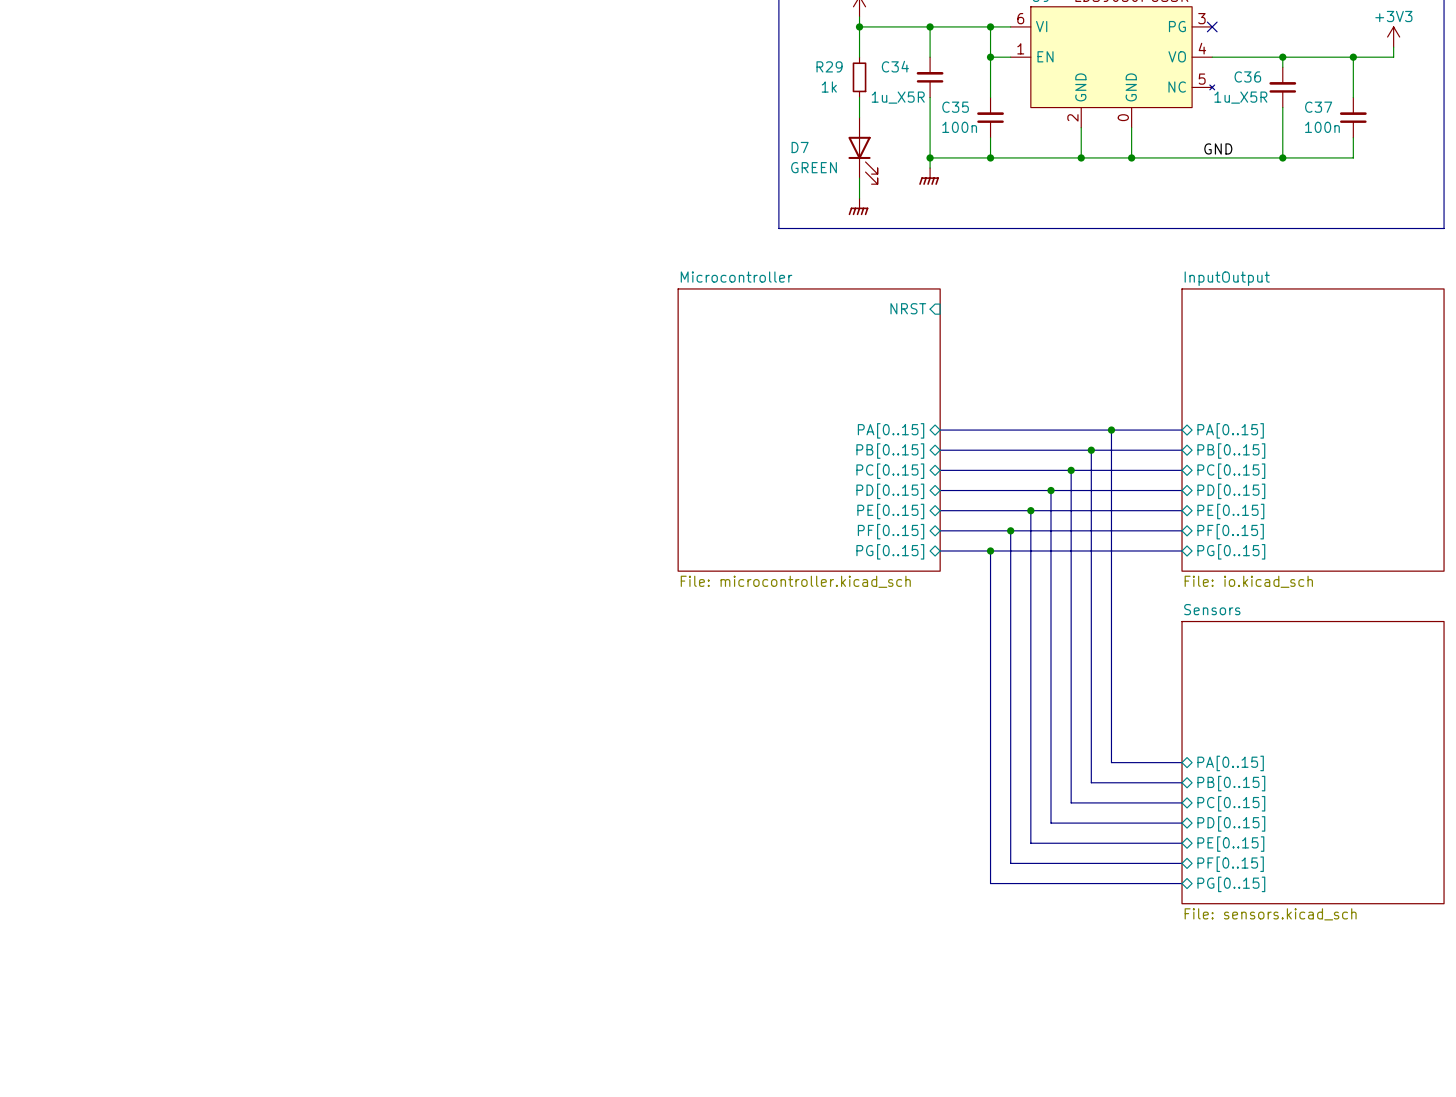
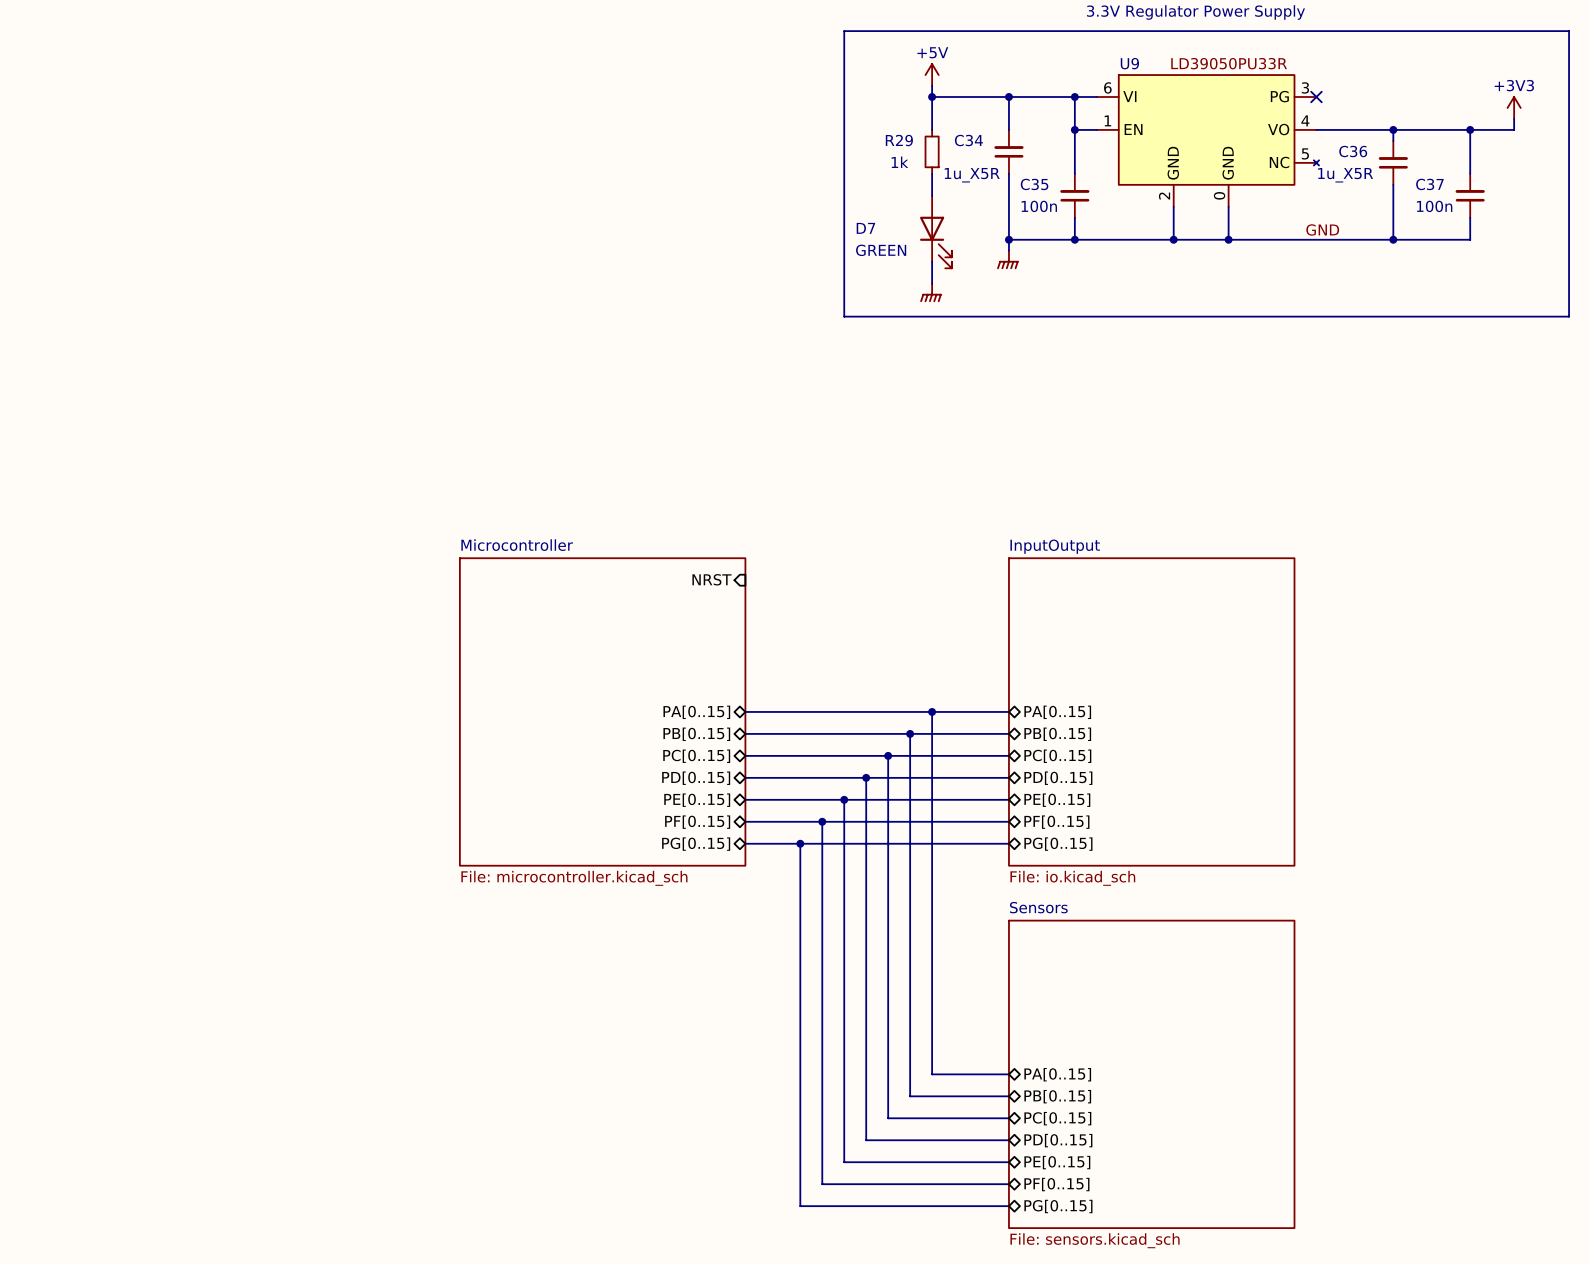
sheet pin: NRST (908, 308) -> none
sheet Microcontroller: File: microcontroller.kicad_sch (809, 430) -> none
sheet pin: PA[0..15] (891, 430) -> none
bus: (940, 430) (1182, 430) -> none
bus: (1111, 430) (1111, 762) (1182, 762) -> none
junction: (1111, 430) -> none
sheet pin: PA[0..15] (1230, 430) -> none
sheet InputOutput: File: io.kicad_sch (1313, 430) -> none
bus: (940, 450) (1182, 450) -> none
bus: (1091, 450) (1091, 782) (1182, 782) -> none
junction: (1091, 450) -> none
sheet pin: PB[0..15] (890, 451) -> none
sheet pin: PB[0..15] (1231, 451) -> none
sheet pin: none -> NRST (711, 579)
bus: (940, 470) (1182, 470) -> none
bus: (1071, 470) (1071, 802) (1182, 802) -> none
junction: (1071, 470) -> none
sheet pin: PC[0..15] (890, 471) -> none
sheet pin: PC[0..15] (1231, 471) -> none
bus: (940, 490) (1182, 490) -> none
bus: (1051, 490) (1051, 823) (1182, 823) -> none
junction: (1051, 490) -> none
sheet pin: PD[0..15] (890, 491) -> none
sheet pin: PD[0..15] (1231, 491) -> none
bus: (940, 510) (1182, 510) -> none
bus: (1030, 510) (1030, 843) (1182, 843) -> none
junction: (1030, 510) -> none
sheet pin: PE[0..15] (890, 511) -> none
sheet pin: PE[0..15] (1230, 511) -> none
bus: (940, 530) (1182, 530) -> none
bus: (1010, 530) (1010, 863) (1182, 863) -> none
junction: (1010, 530) -> none
sheet pin: PF[0..15] (891, 531) -> none
sheet pin: PF[0..15] (1230, 531) -> none
bus: (940, 550) (1182, 550) -> none
bus: (990, 550) (990, 883) (1182, 883) -> none
junction: (990, 550) -> none
sheet pin: PG[0..15] (890, 551) -> none
sheet pin: PG[0..15] (1231, 551) -> none
sheet Microcontroller: none -> File: microcontroller.kicad_sch (602, 711)
bus: none -> (745, 711) (1008, 711)
bus: none -> (932, 711) (932, 1074) (1008, 1074)
junction: none -> (932, 711)
sheet InputOutput: none -> File: io.kicad_sch (1151, 711)
sheet pin: none -> PA[0..15] (696, 712)
sheet pin: none -> PA[0..15] (1057, 712)
bus: none -> (745, 733) (1008, 733)
bus: none -> (910, 733) (910, 1096) (1008, 1096)
junction: none -> (910, 733)
sheet pin: none -> PB[0..15] (696, 734)
sheet pin: none -> PB[0..15] (1057, 734)
bus: none -> (745, 755) (1008, 755)
bus: none -> (888, 755) (888, 1118) (1008, 1118)
junction: none -> (888, 755)
sheet pin: none -> PC[0..15] (696, 756)
sheet pin: none -> PC[0..15] (1057, 756)
bus: none -> (745, 777) (1008, 777)
bus: none -> (866, 777) (866, 1140) (1008, 1140)
junction: none -> (866, 777)
sheet pin: none -> PD[0..15] (696, 778)
sheet pin: none -> PD[0..15] (1058, 778)
bus: none -> (745, 799) (1008, 799)
bus: none -> (844, 799) (844, 1162) (1008, 1162)
junction: none -> (844, 799)
sheet pin: none -> PE[0..15] (697, 800)
sheet pin: none -> PE[0..15] (1057, 800)
sheet pin: none -> PF[0..15] (697, 822)
bus: none -> (745, 821) (1008, 821)
bus: none -> (822, 821) (822, 1184) (1008, 1184)
junction: none -> (822, 821)
sheet pin: none -> PF[0..15] (1056, 822)
bus: none -> (745, 843) (1008, 843)
bus: none -> (800, 843) (800, 1206) (1008, 1206)
junction: none -> (800, 843)
sheet pin: none -> PG[0..15] (696, 844)
sheet pin: none -> PG[0..15] (1058, 844)
sheet Sensors: File: sensors.kicad_sch (1313, 762) -> none
sheet pin: PA[0..15] (1230, 763) -> none
sheet pin: PB[0..15] (1231, 783) -> none
sheet pin: PC[0..15] (1231, 803) -> none
sheet pin: PD[0..15] (1231, 823) -> none
sheet pin: PE[0..15] (1230, 844) -> none
sheet pin: PF[0..15] (1230, 864) -> none
sheet pin: PG[0..15] (1231, 884) -> none
sheet Sensors: none -> File: sensors.kicad_sch (1151, 1074)
sheet pin: none -> PA[0..15] (1057, 1074)
sheet pin: none -> PB[0..15] (1057, 1096)
sheet pin: none -> PC[0..15] (1057, 1118)
sheet pin: none -> PD[0..15] (1058, 1140)
sheet pin: none -> PE[0..15] (1057, 1162)
sheet pin: none -> PF[0..15] (1056, 1184)
sheet pin: none -> PG[0..15] (1058, 1206)

